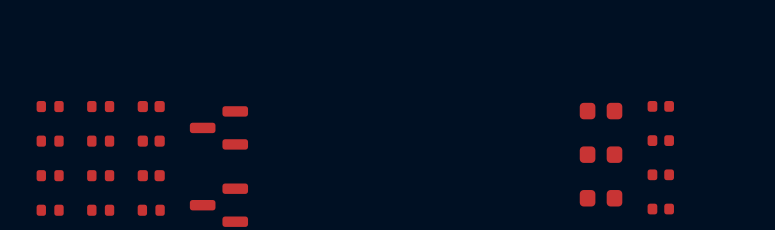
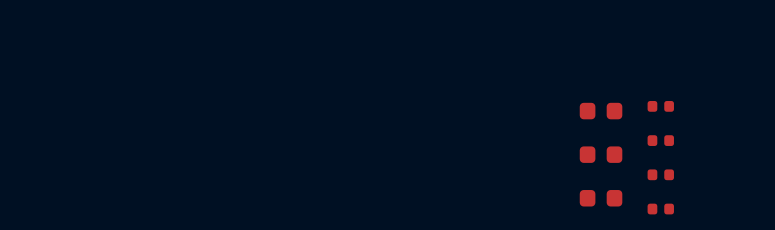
part: (50, 106) -> none
part: (100, 106) -> none
part: (151, 106) -> none
part: (218, 127) -> none
part: (50, 141) -> none
part: (100, 141) -> none
part: (151, 141) -> none
part: (50, 175) -> none
part: (100, 175) -> none
part: (151, 175) -> none
part: (218, 205) -> none
part: (50, 210) -> none
part: (100, 210) -> none
part: (151, 210) -> none

